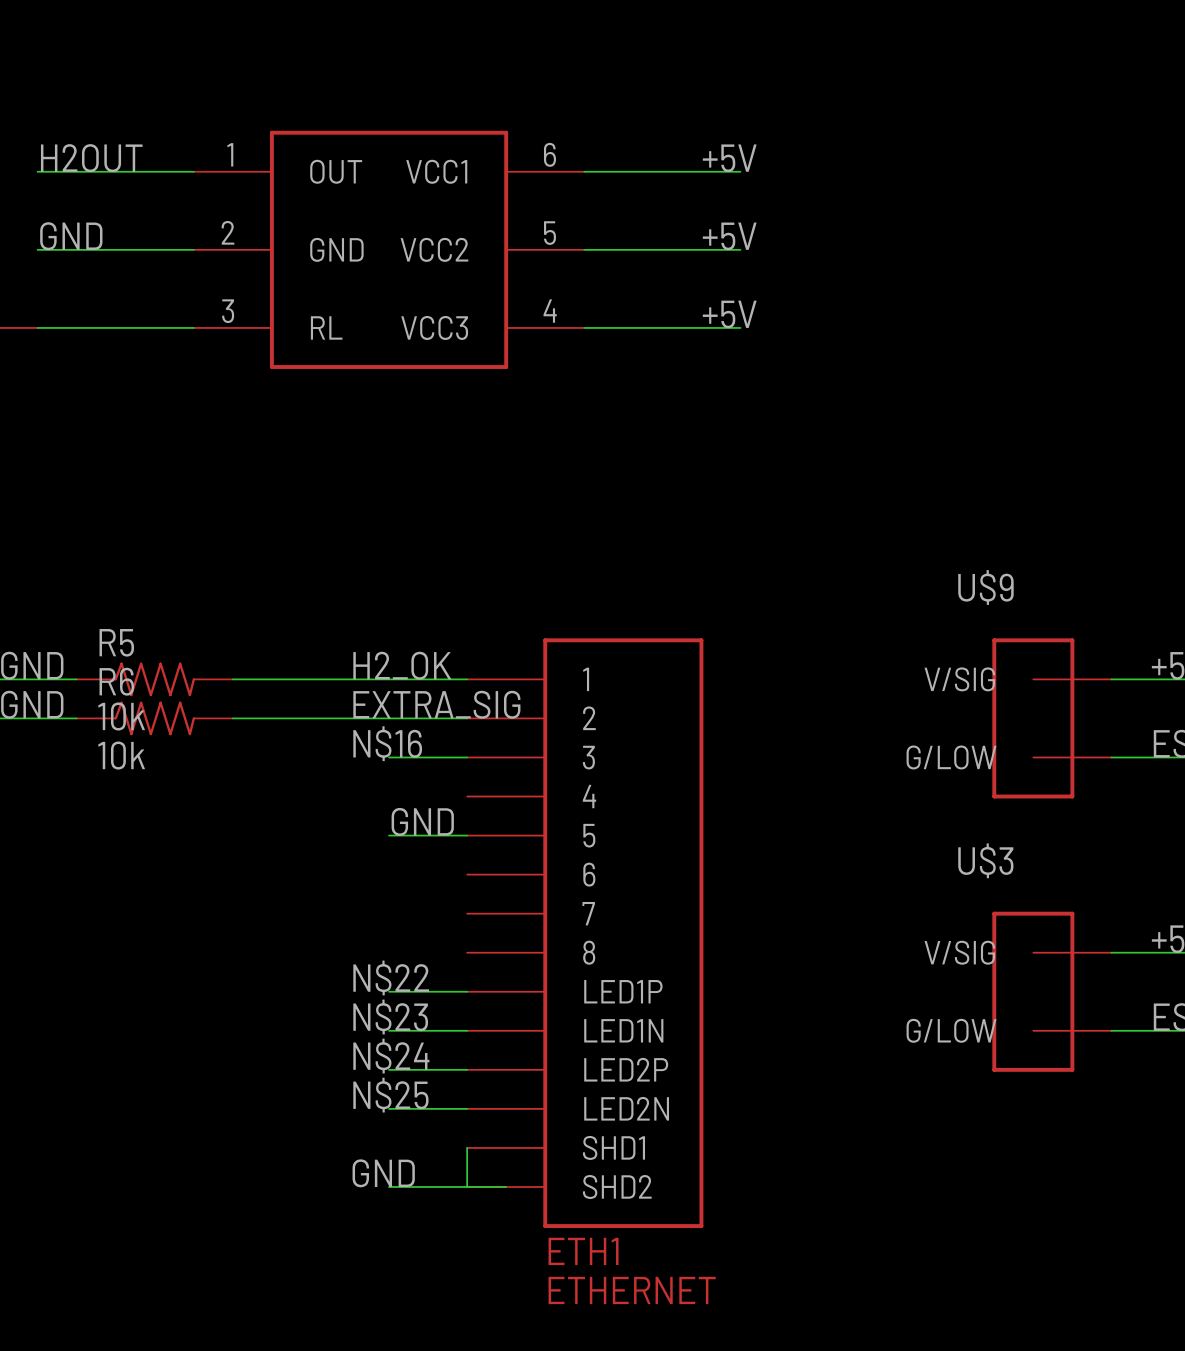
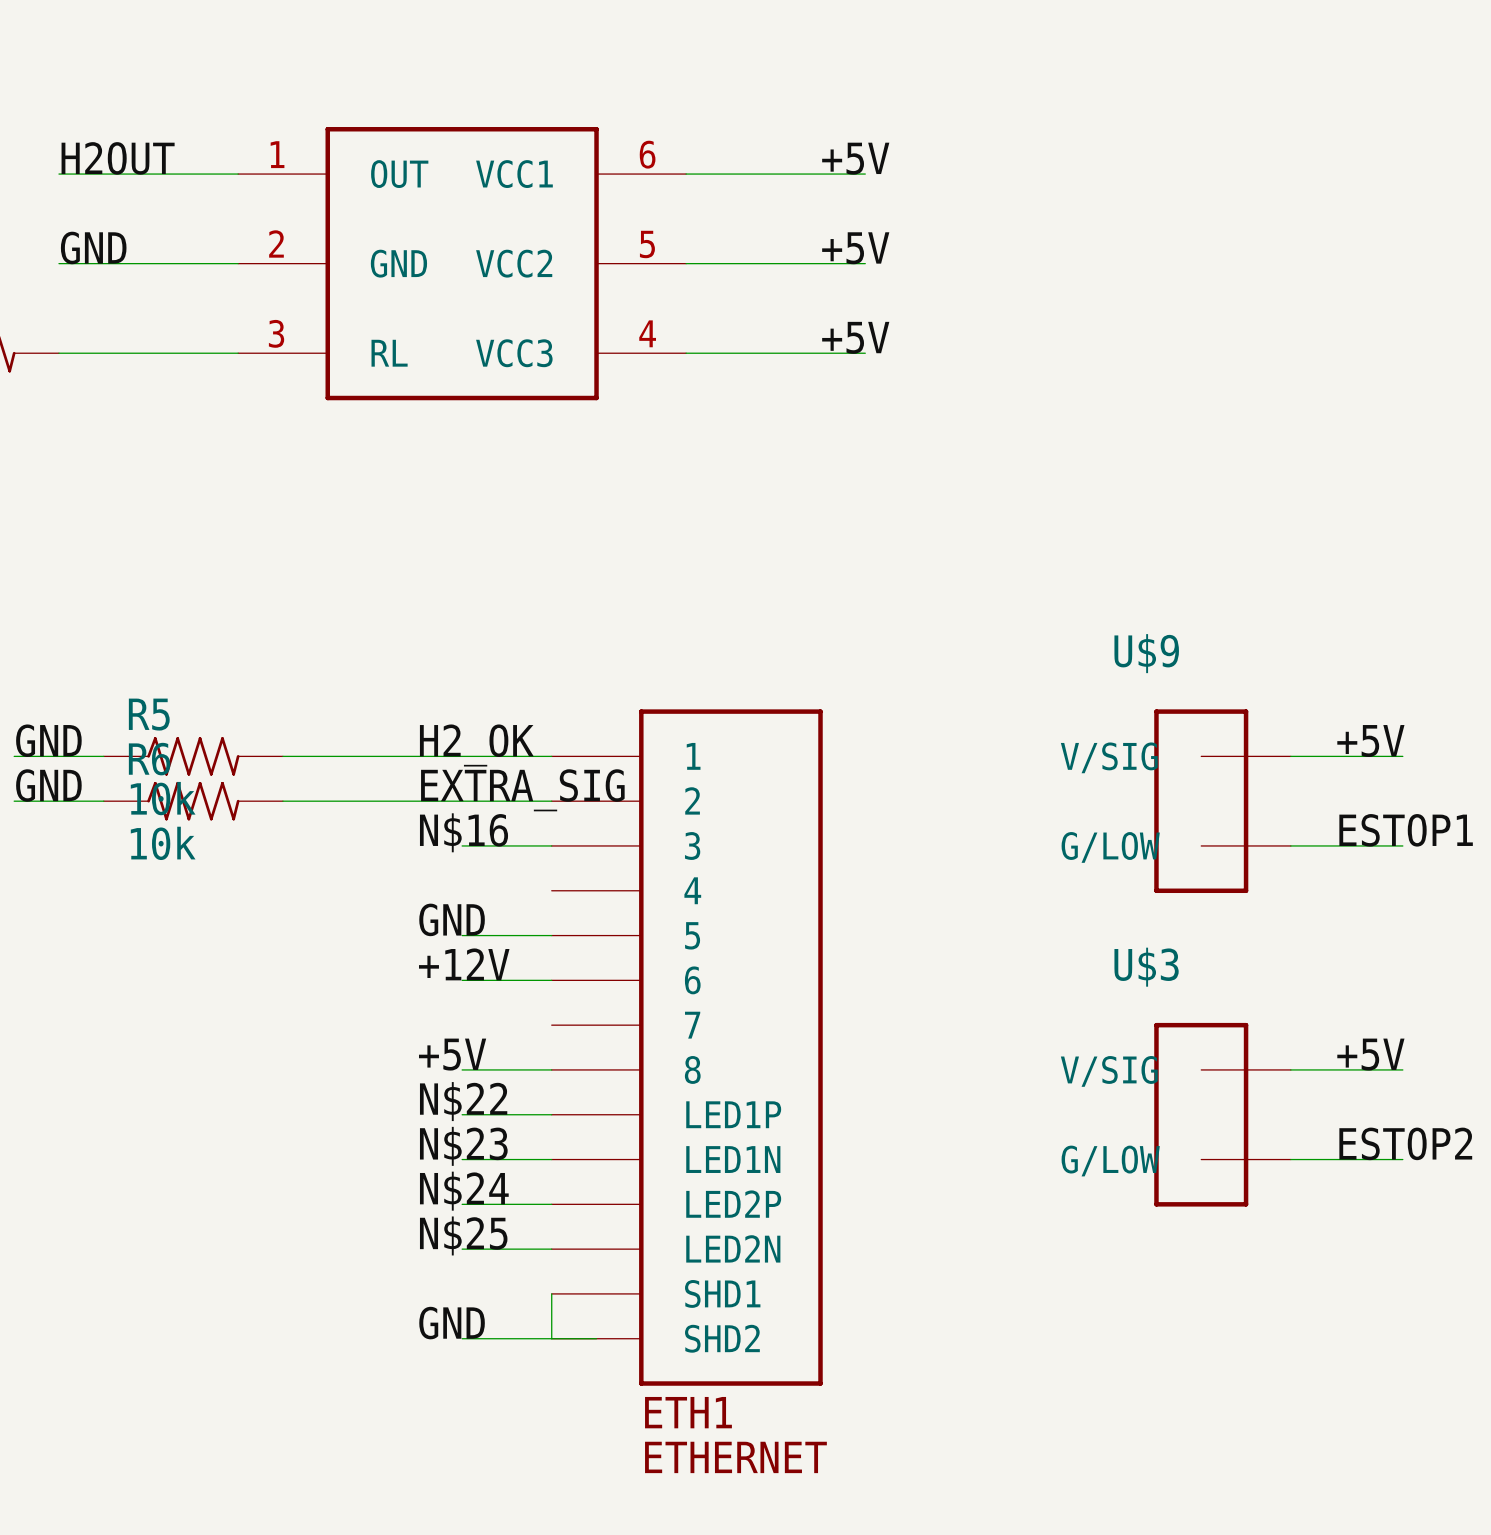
label position: GND (422, 821) -> GND (452, 919)
label: none -> +12V (464, 964)
wire: none -> (462, 980) (551, 980)
label: none -> +5V (452, 1054)
wire: none -> (462, 1069) (551, 1069)

